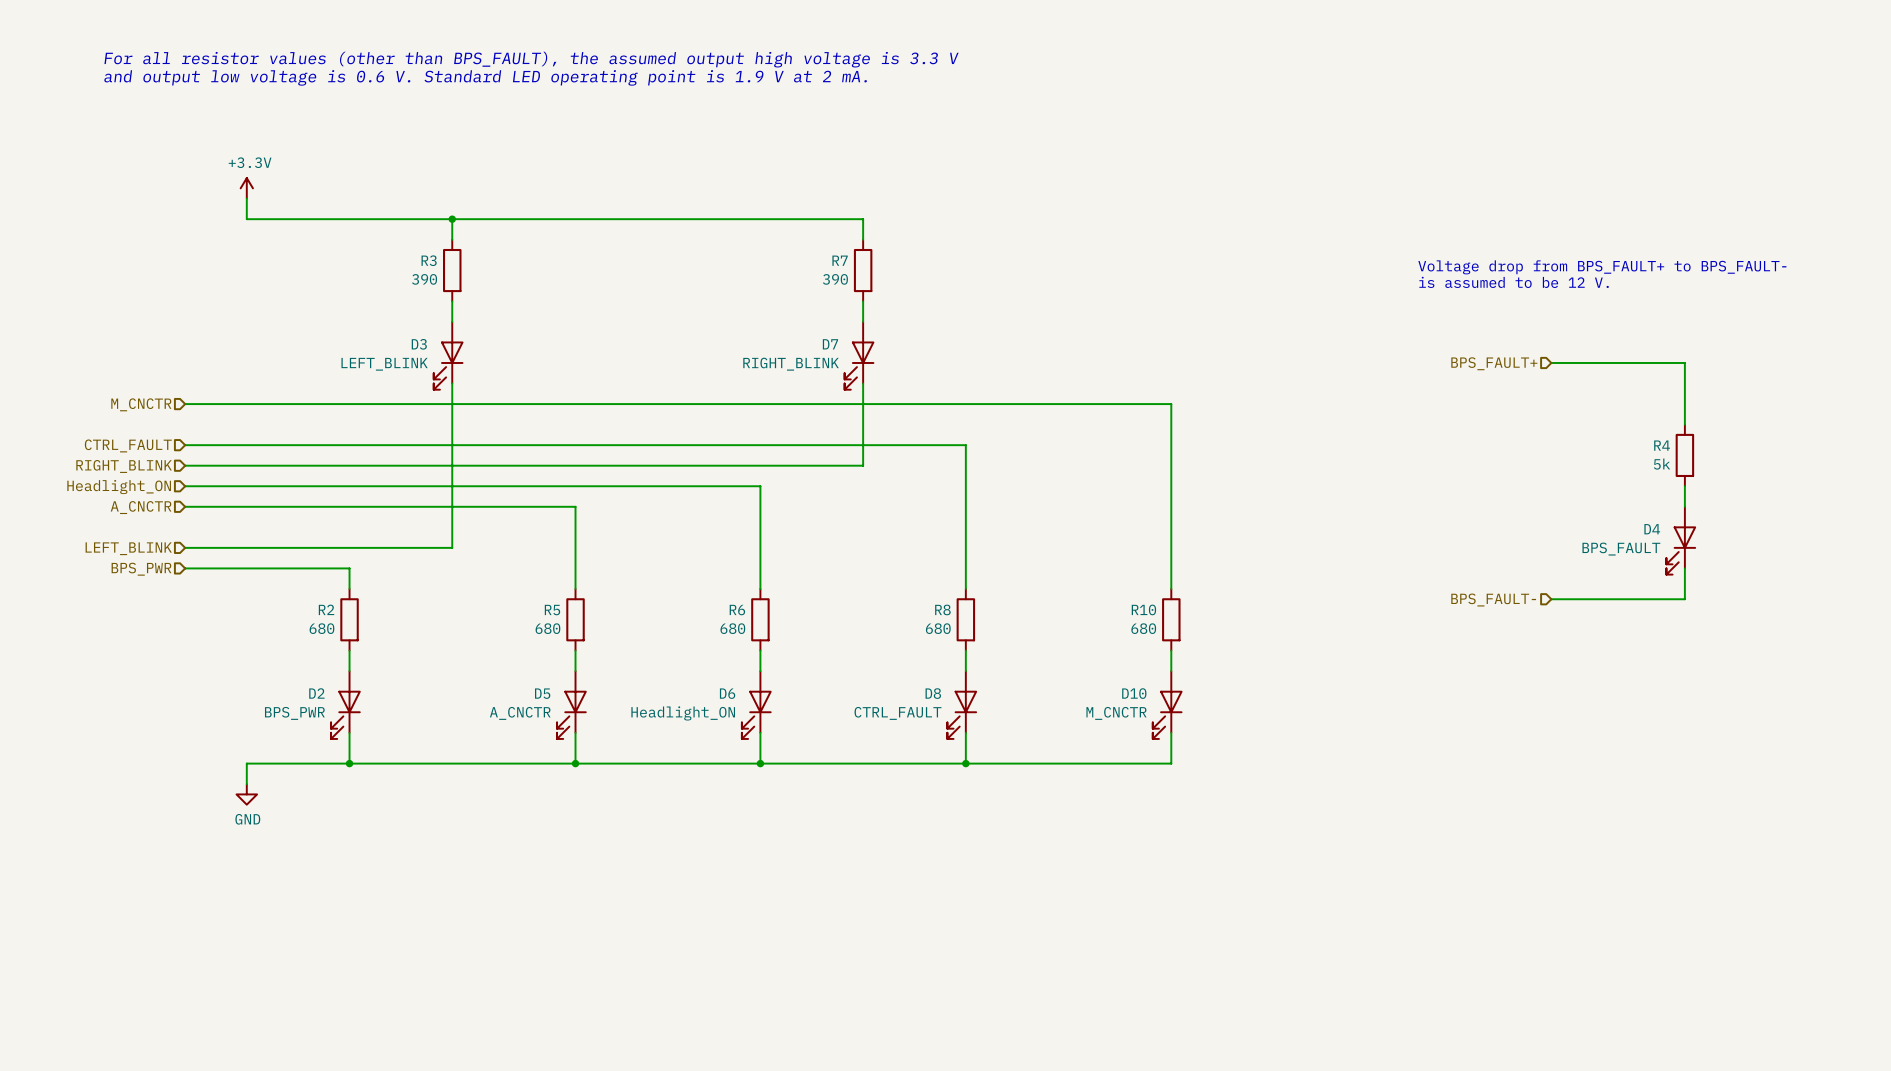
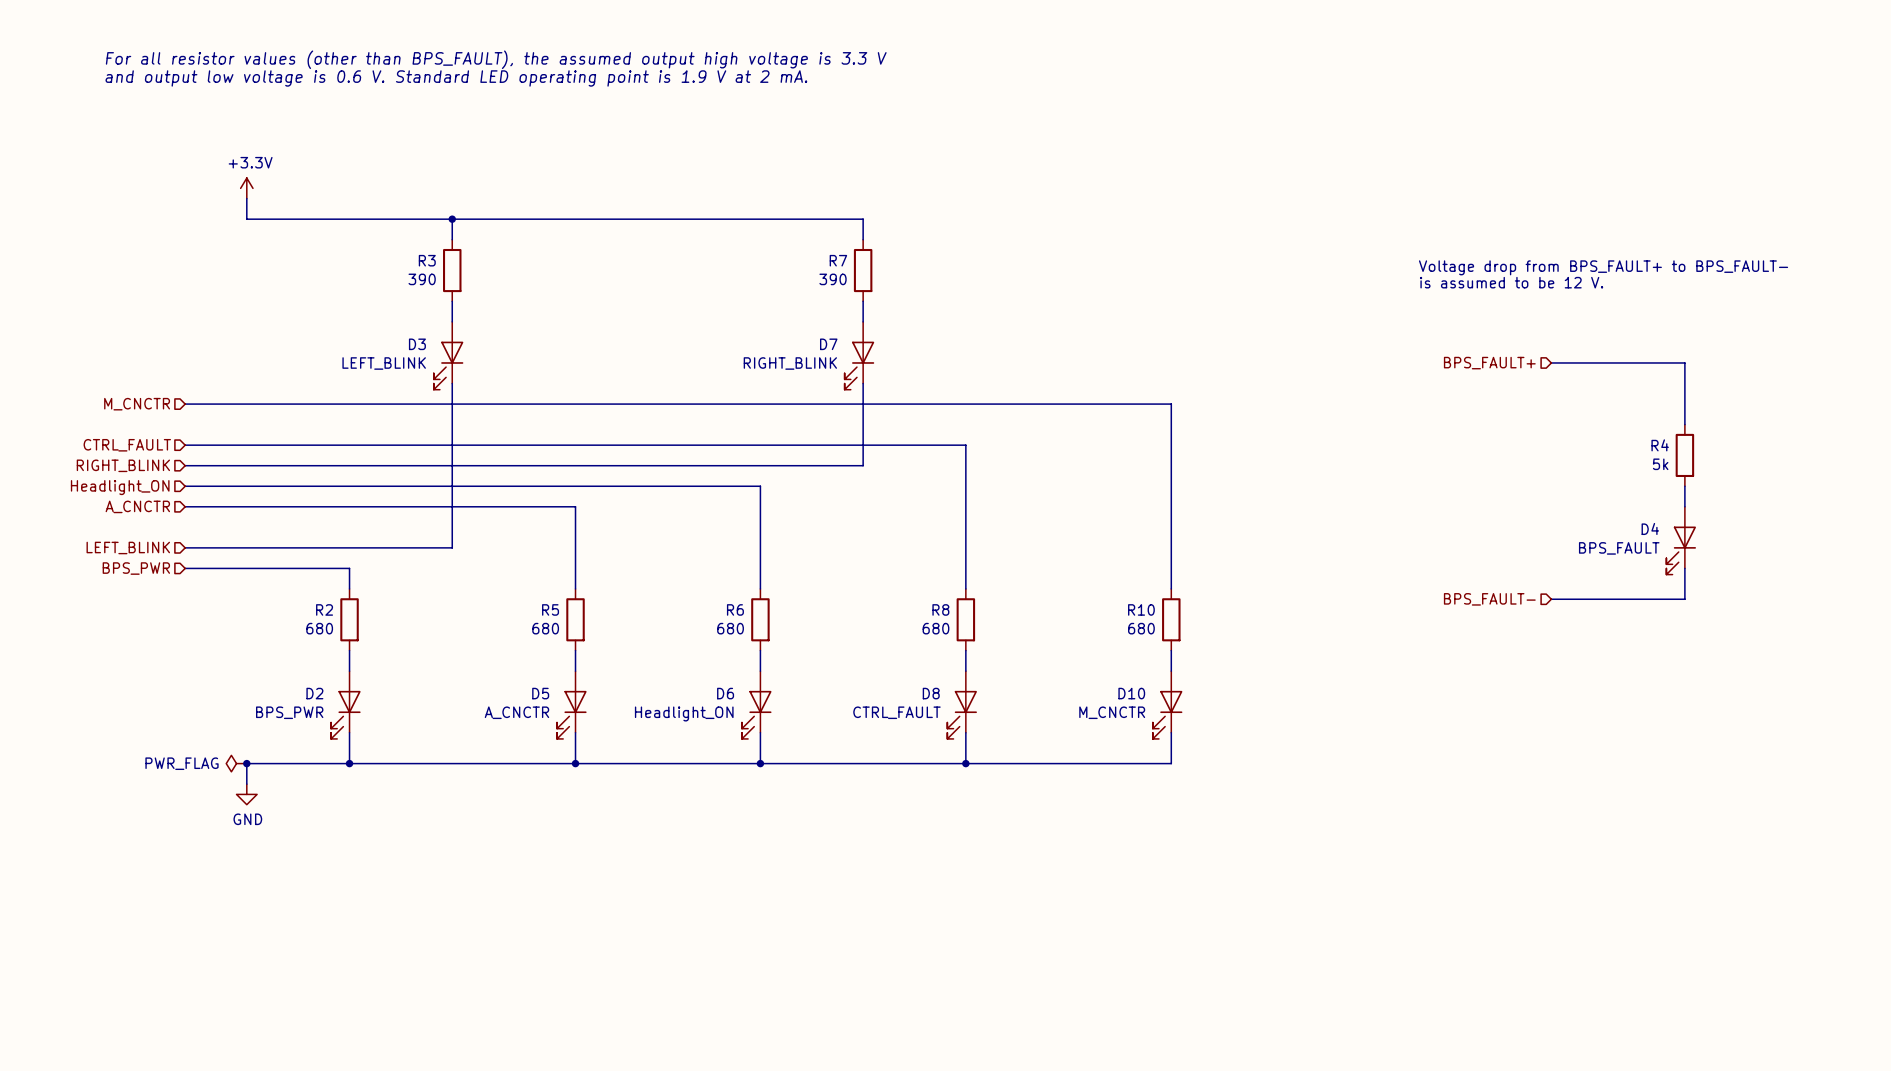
power symbol: none -> PWR_FLAG (236, 763)
junction: none -> (246, 763)

